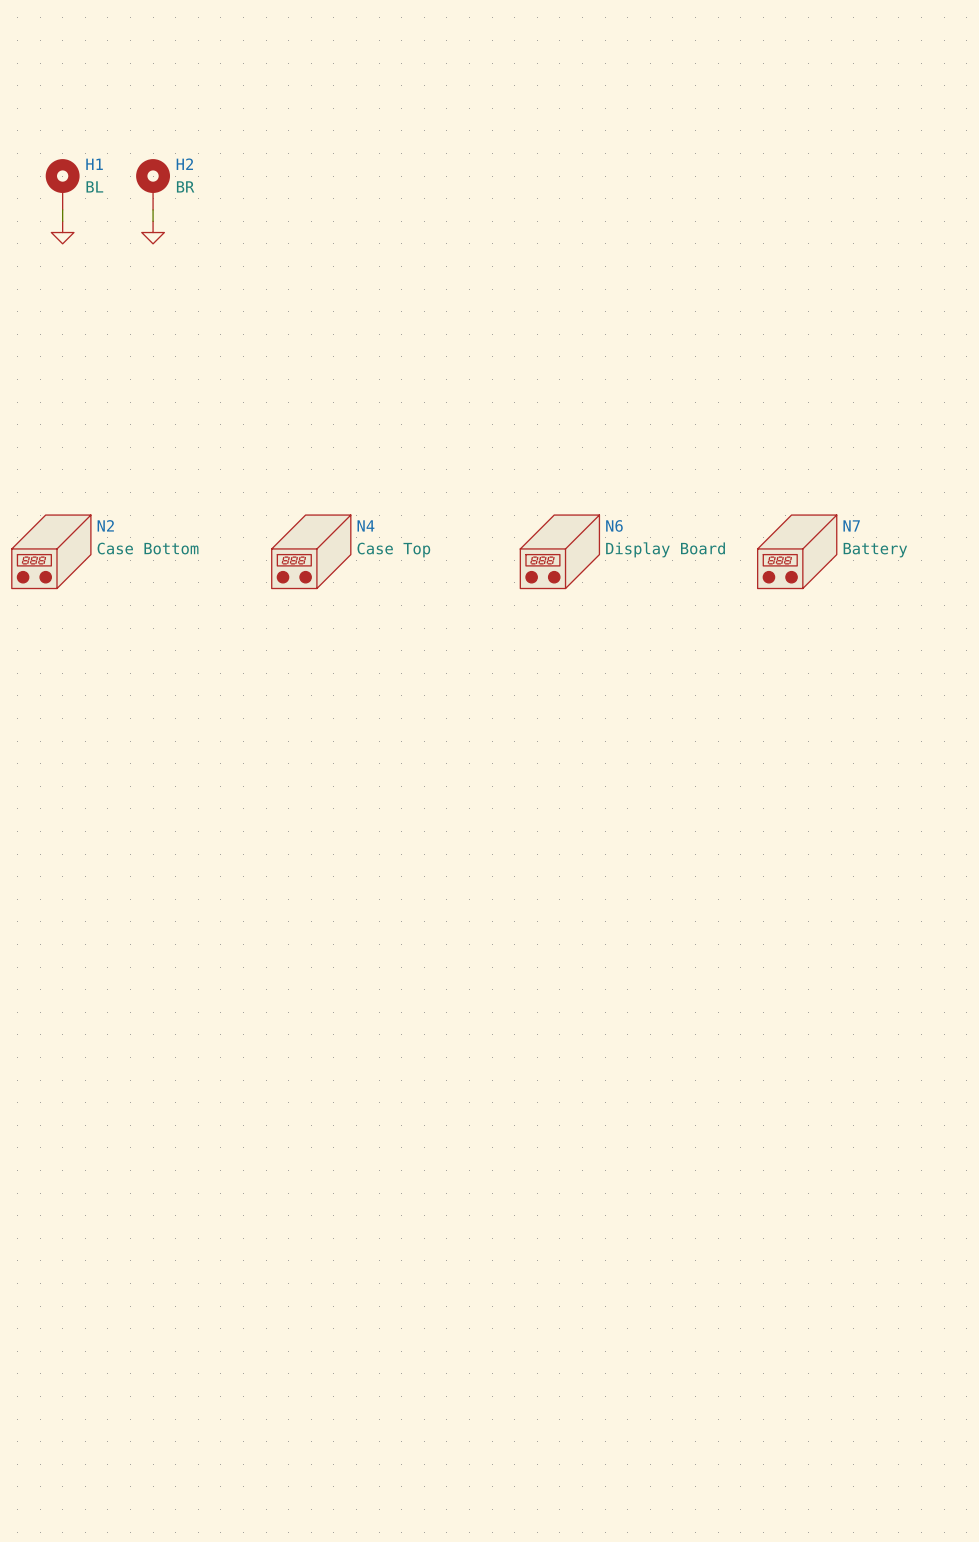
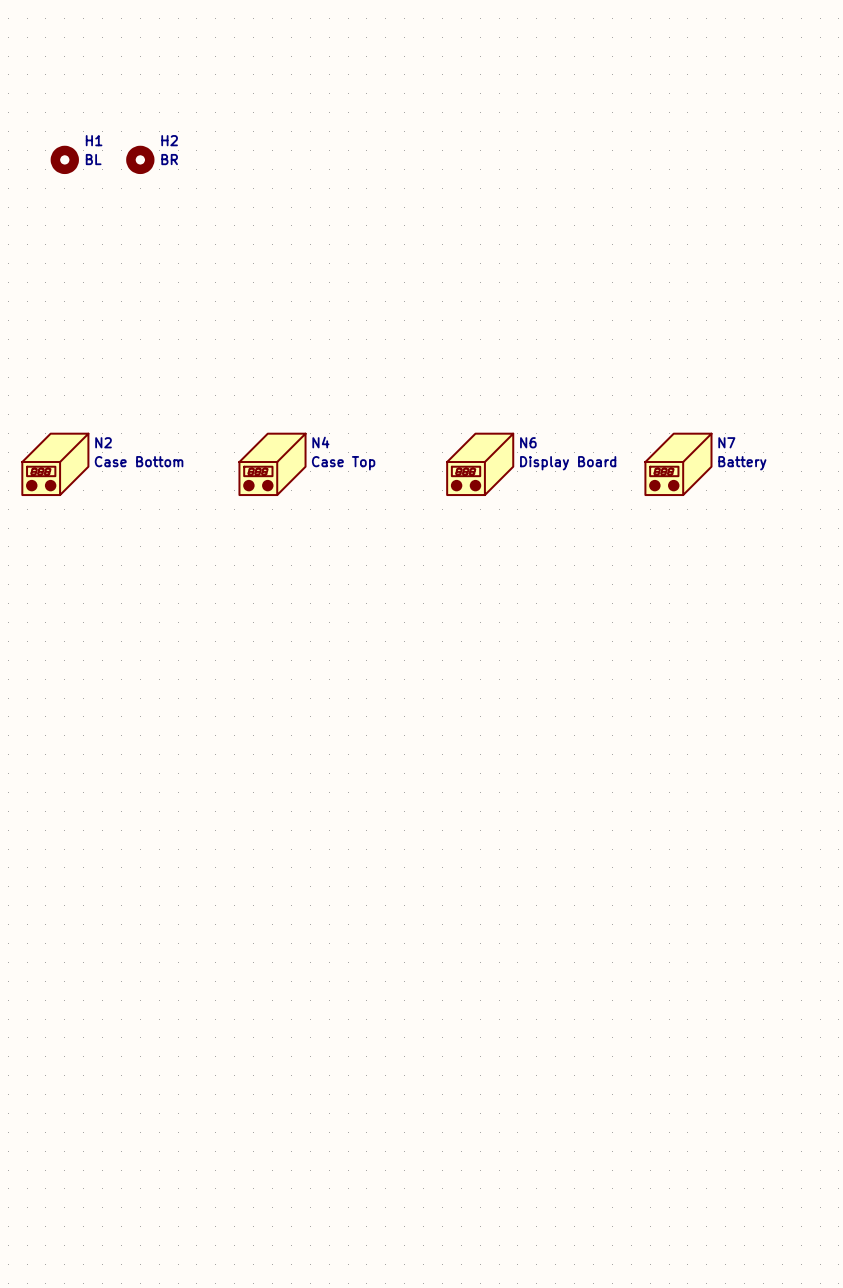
H1 symbol: [45, 159, 80, 210] -> [50, 145, 79, 175]
H2 symbol: [136, 159, 171, 210] -> [126, 145, 155, 175]
wire: (62, 209) (62, 221) -> none
wire: (153, 209) (153, 221) -> none
power symbol: (62, 232) -> none
power symbol: (153, 232) -> none

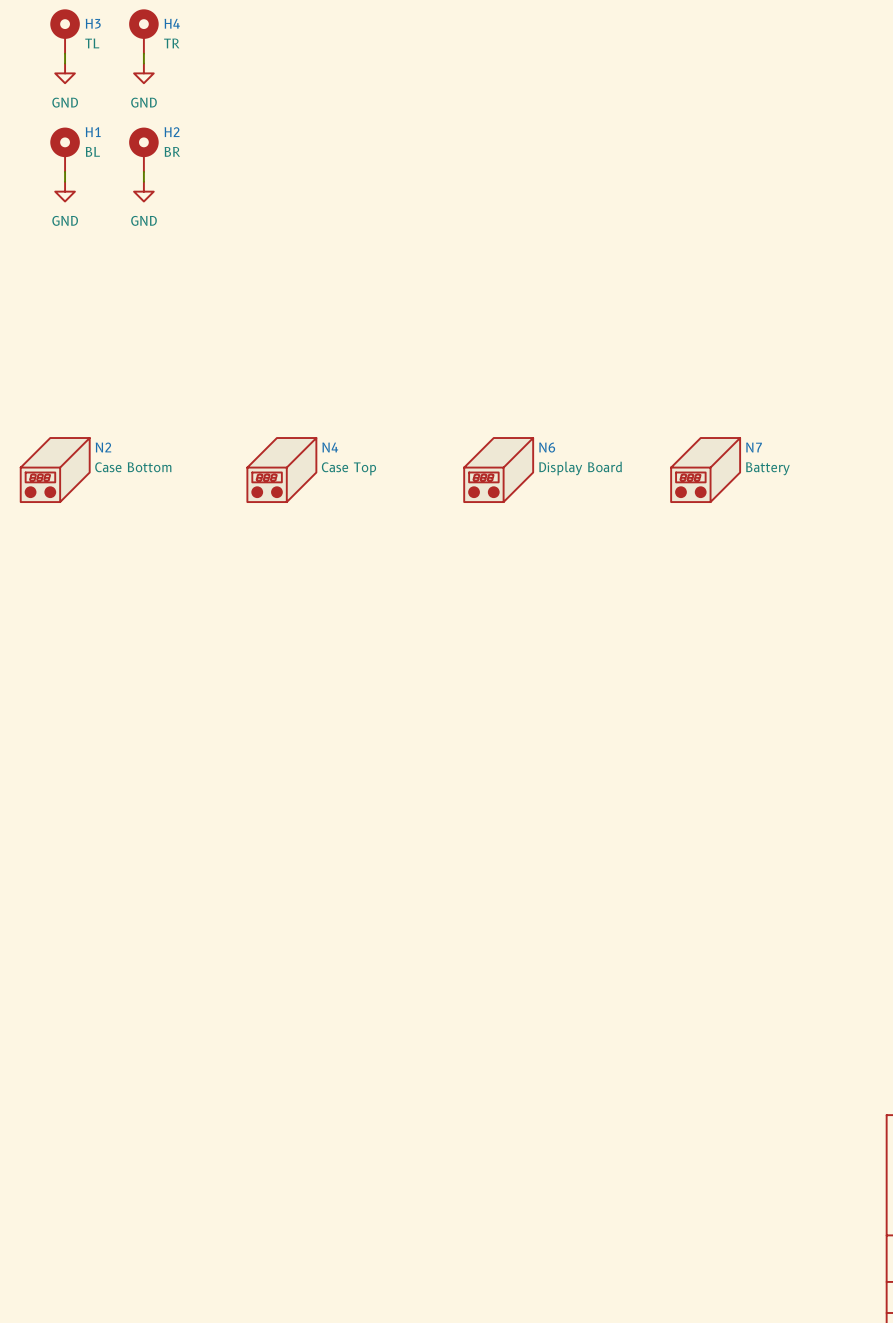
H3: none -> TL (65, 31)
H4: none -> TR (143, 31)
wire: none -> (65, 53) (65, 63)
wire: none -> (143, 53) (143, 63)
power symbol: none -> GND (65, 73)
power symbol: none -> GND (143, 73)
H1 symbol: [50, 145, 79, 175] -> [50, 127, 80, 172]
H2 symbol: [126, 145, 155, 175] -> [129, 127, 159, 172]
wire: none -> (65, 171) (65, 181)
wire: none -> (143, 171) (143, 181)
power symbol: none -> GND (65, 191)
power symbol: none -> GND (143, 191)

